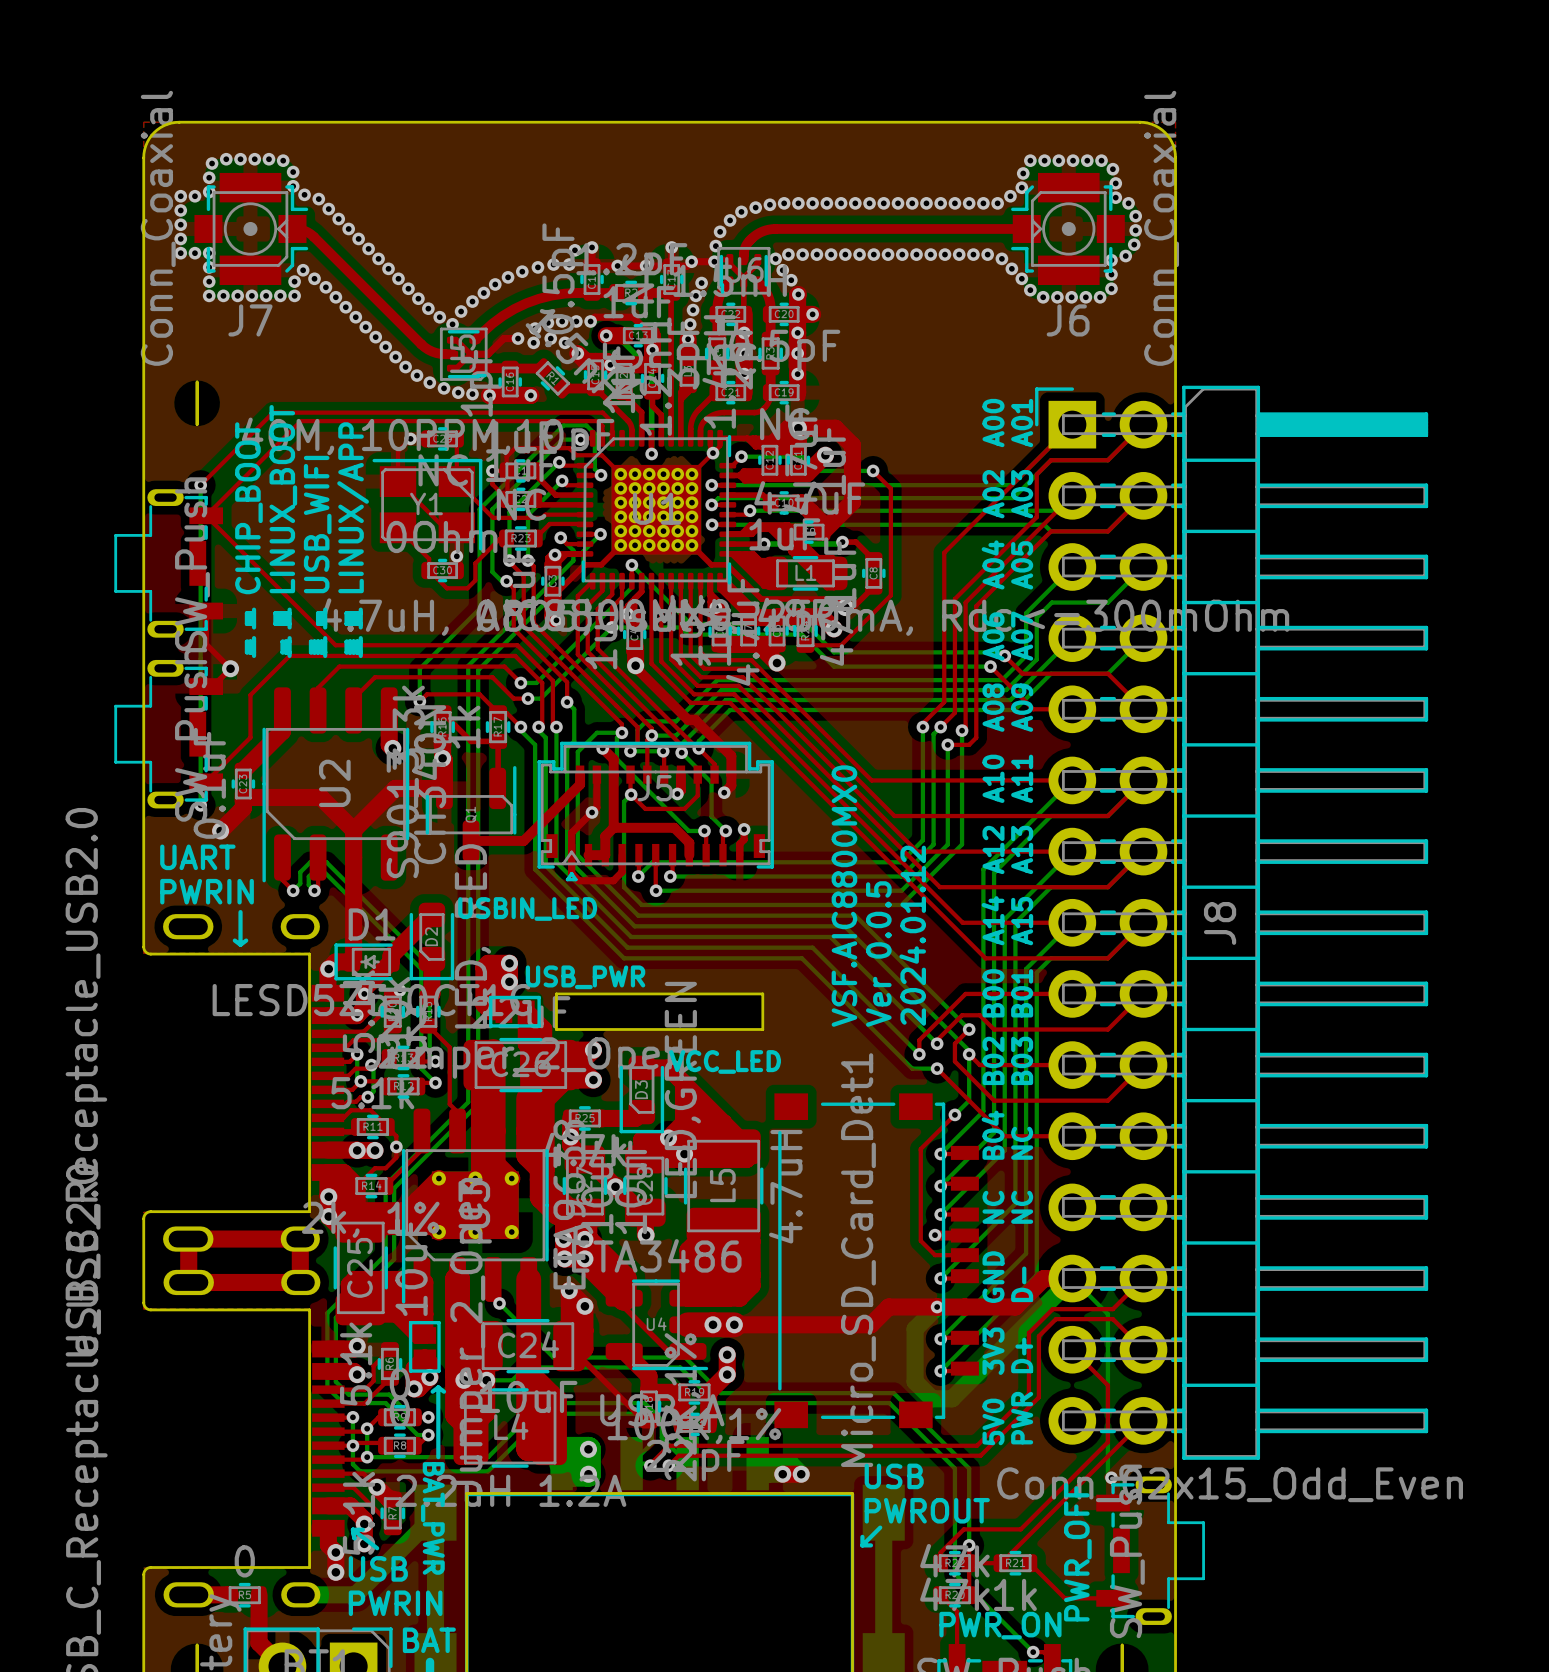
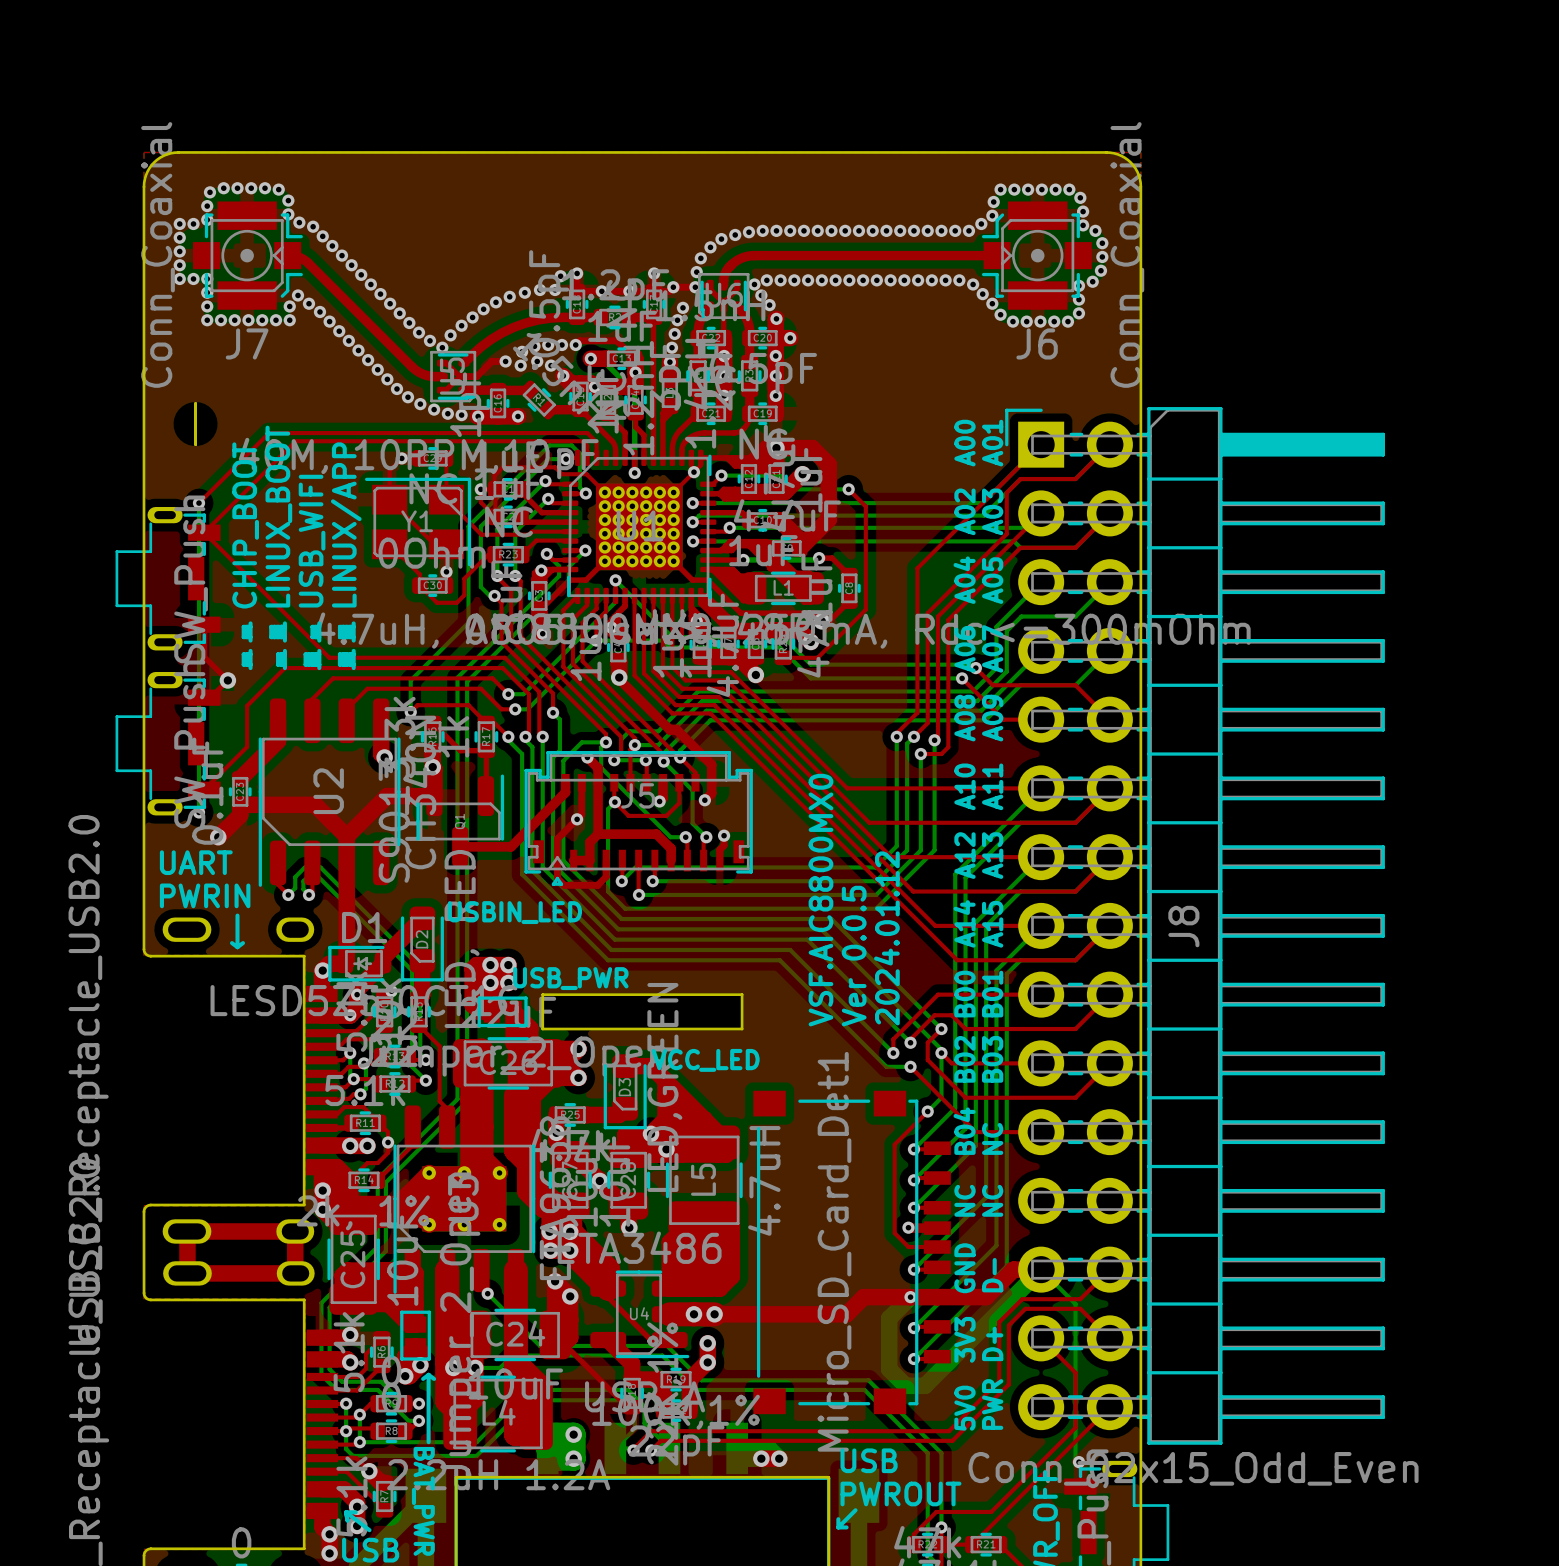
via: none -> (490, 965)
via: (509, 963) -> none
via: none -> (508, 965)
via: none -> (490, 982)
via: (509, 981) -> none
via: none -> (508, 982)

